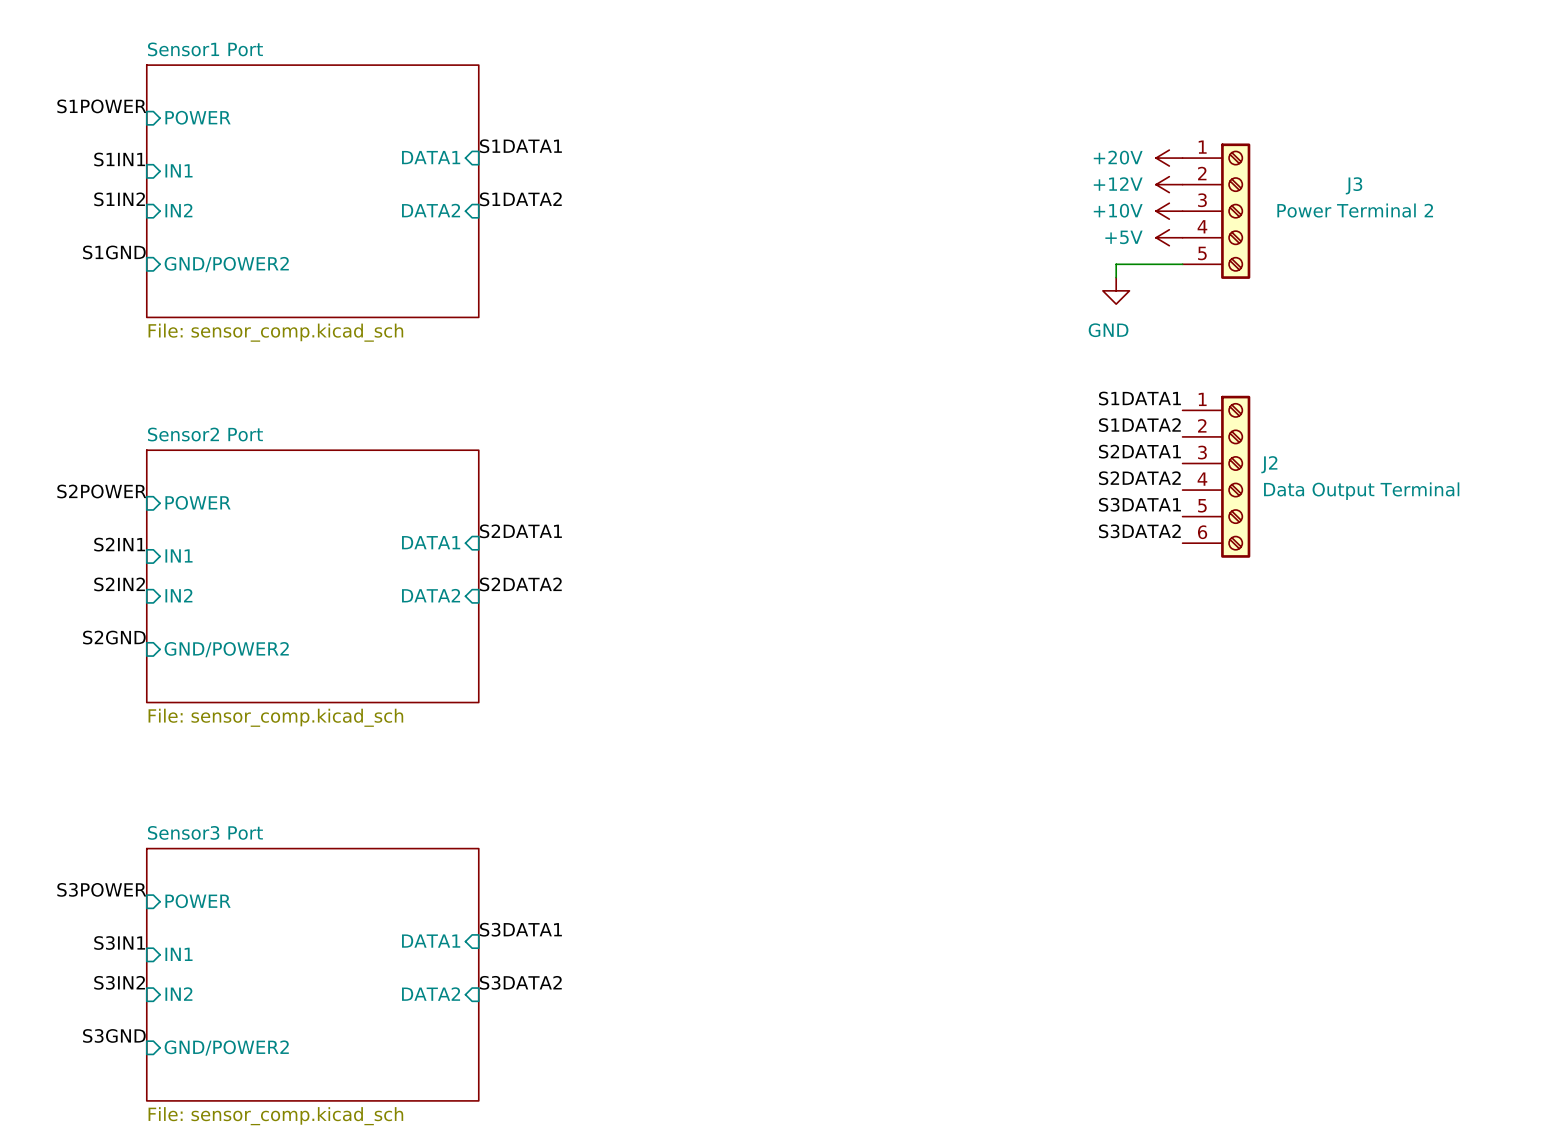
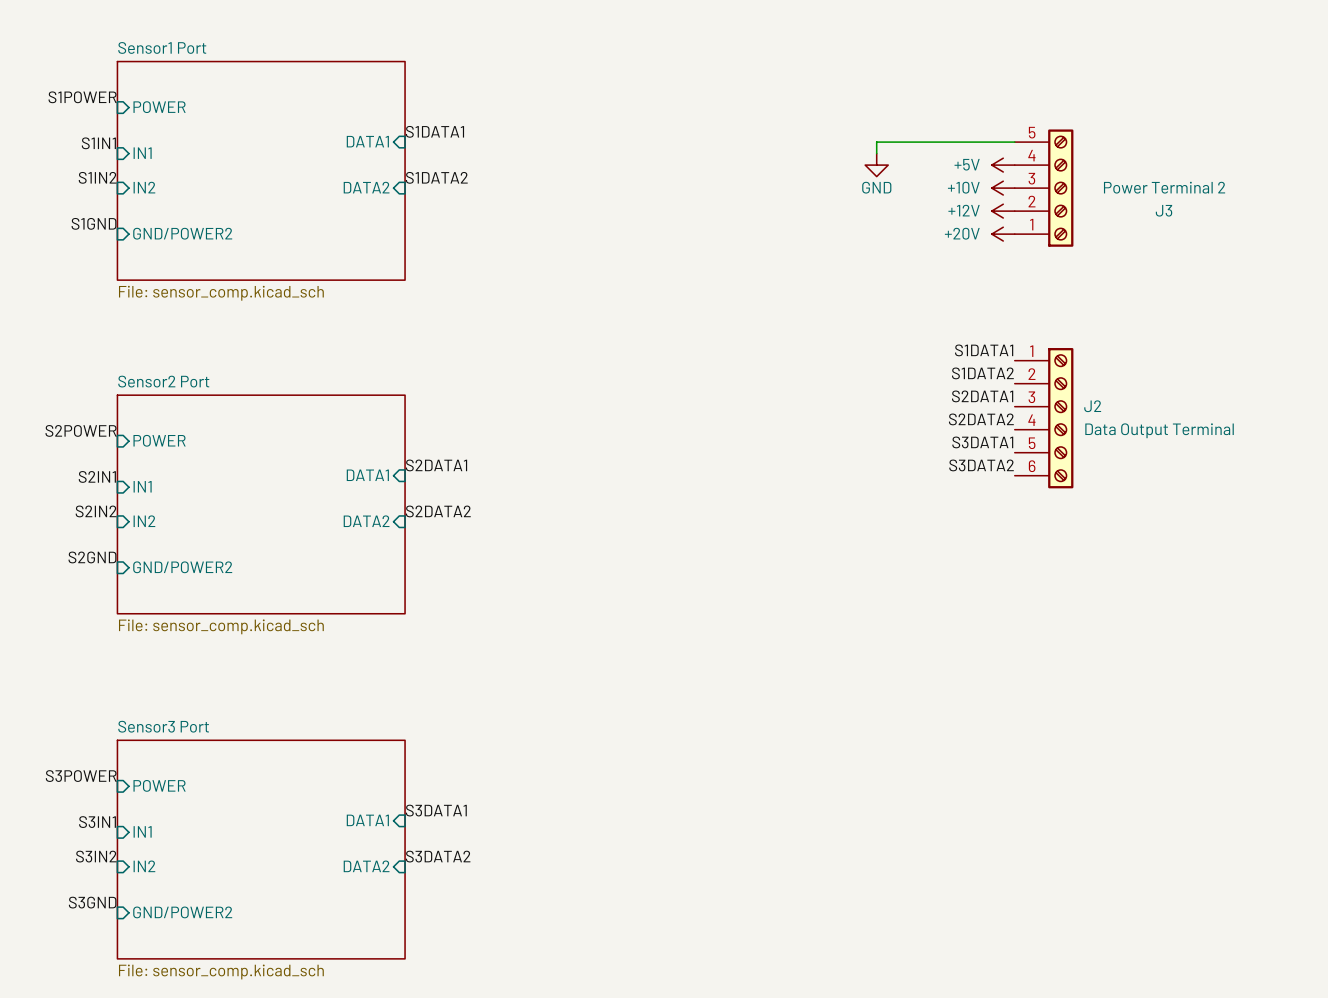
power symbol position: +20V (1169, 158) -> +20V (1003, 234)
wire: none -> (1014, 142) (876, 142) (876, 153)
power symbol: +12V (1169, 184) -> +5V (1003, 165)
J3 flip: as is (1235, 211) -> up-down (1060, 188)
power symbol: +5V (1169, 237) -> +12V (1003, 211)
wire: (1182, 264) (1116, 264) (1116, 277) -> none
power symbol position: GND (1116, 290) -> GND (876, 165)
power symbol text position: GND (1108, 330) -> GND (876, 187)

